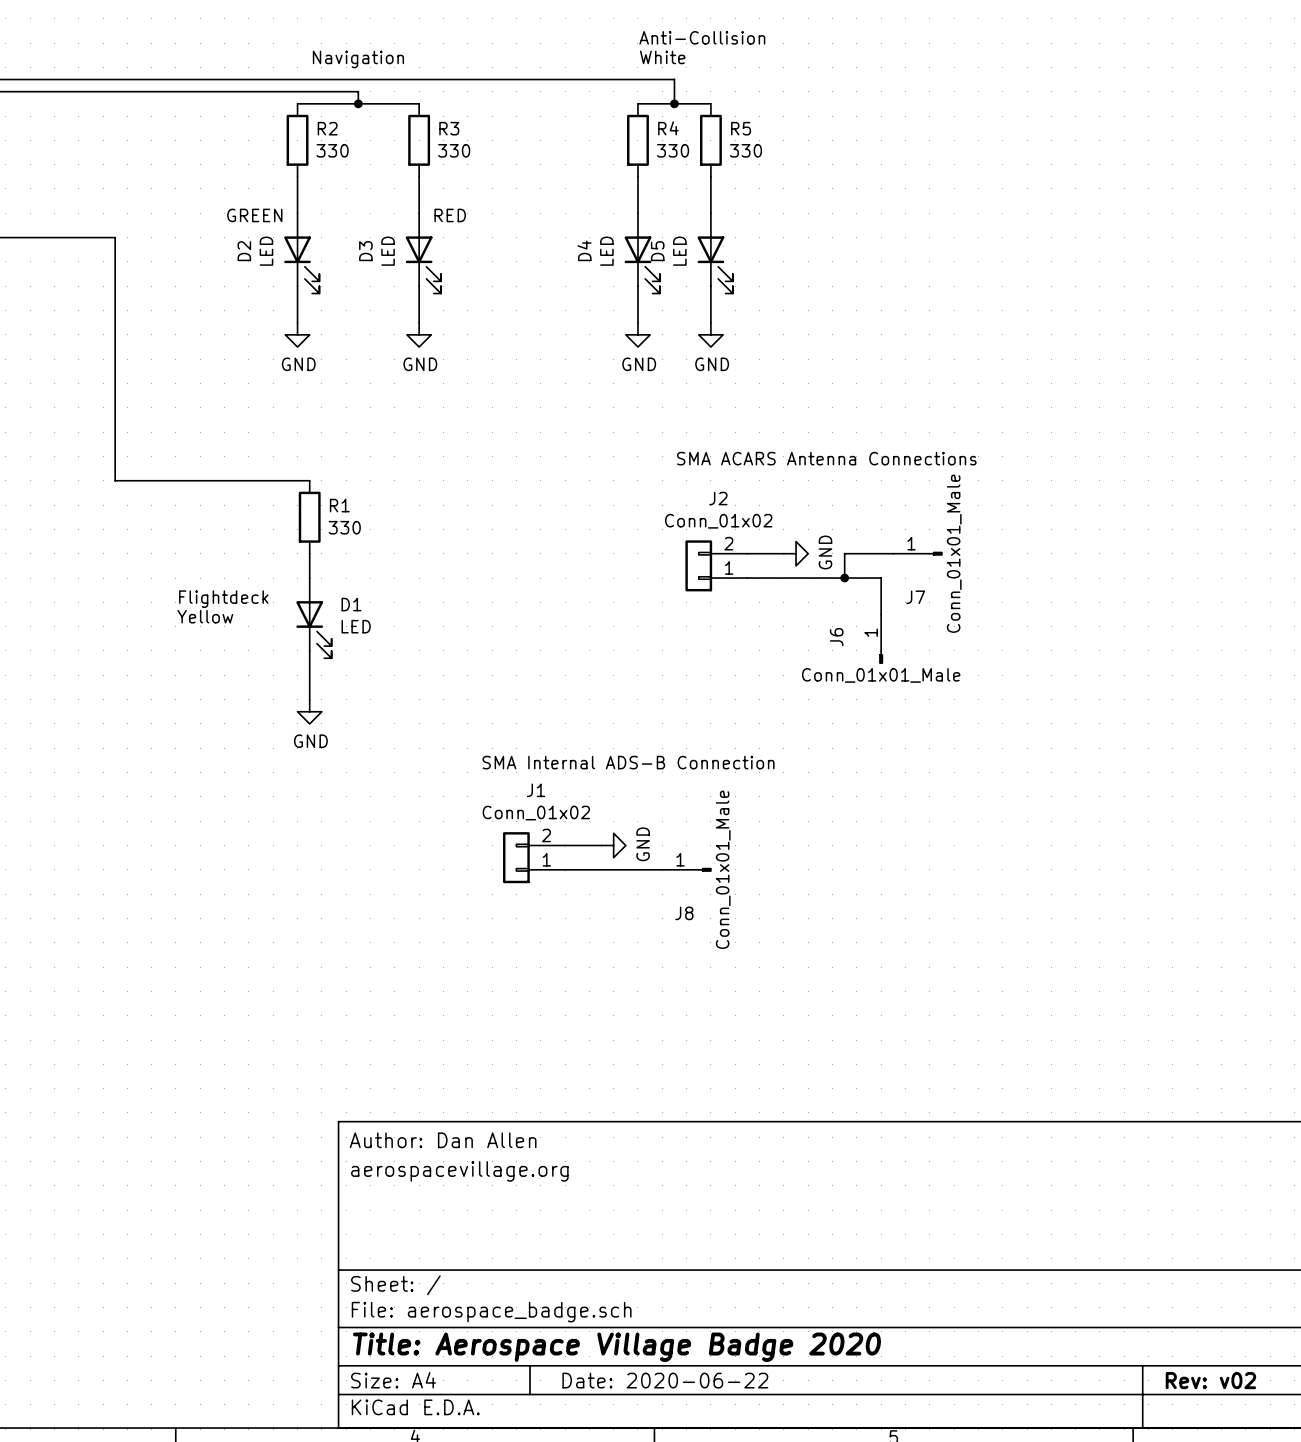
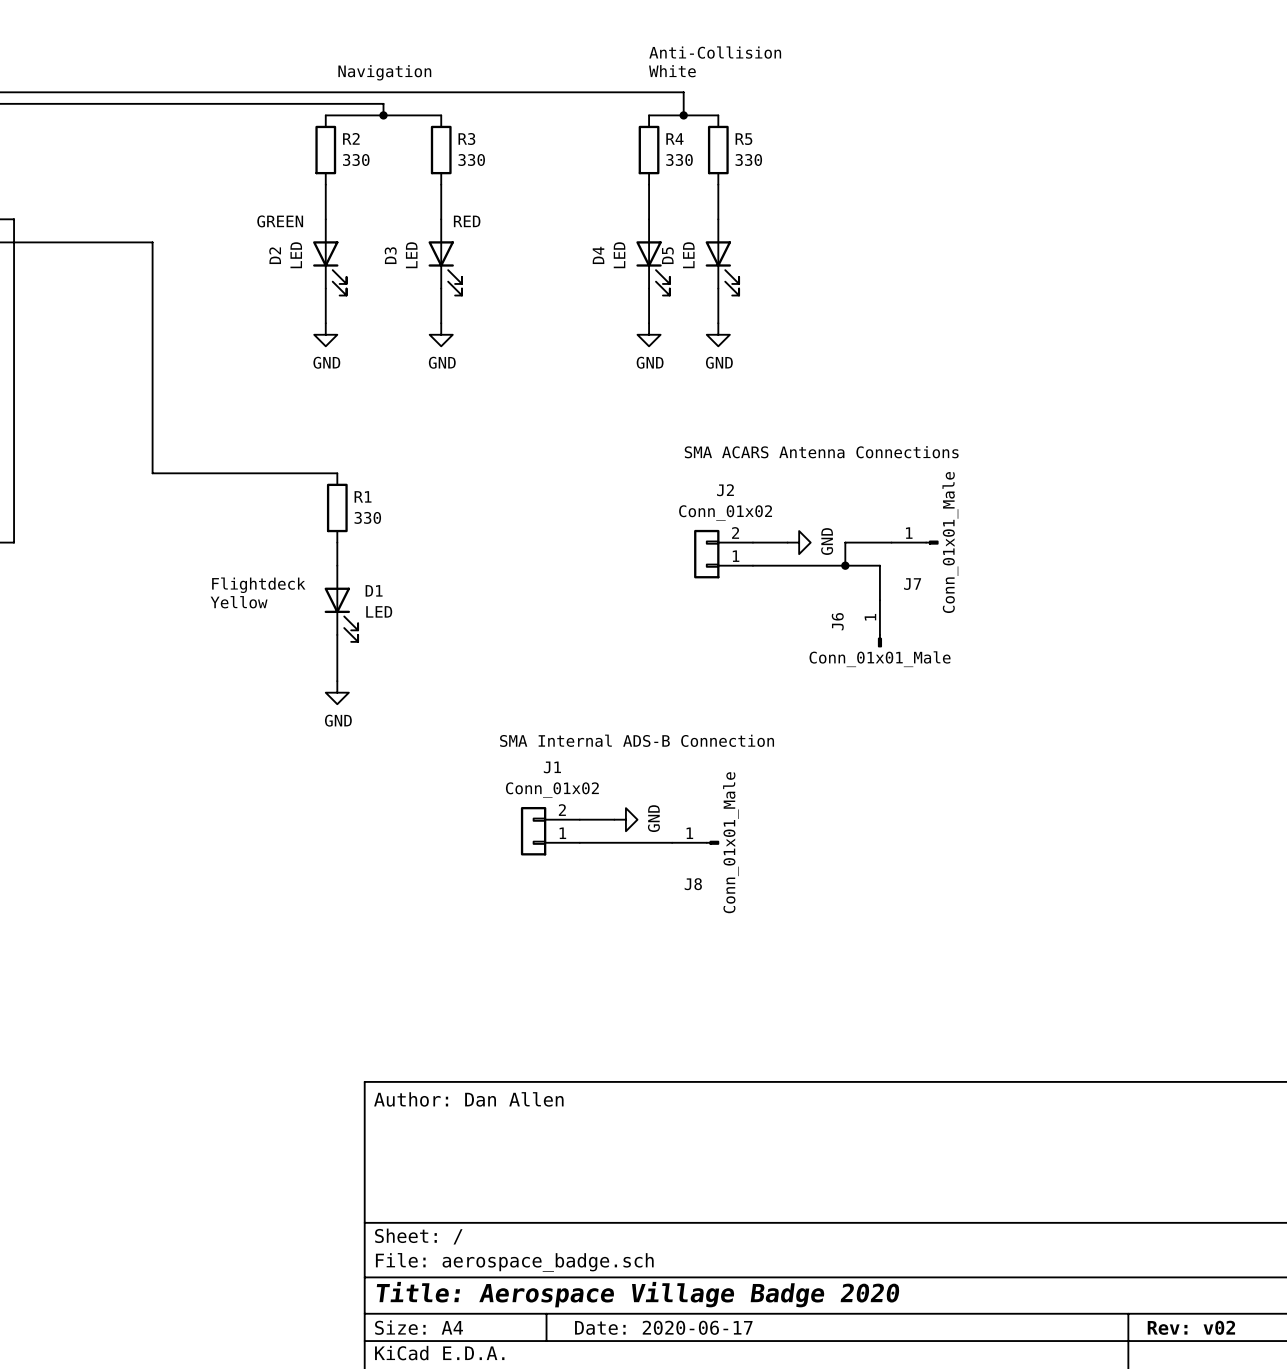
title block: aerospacevillage.org (459, 1171) -> none
title block: Date: 2020-06-22 (665, 1380) -> Date: 2020-06-17 (663, 1327)

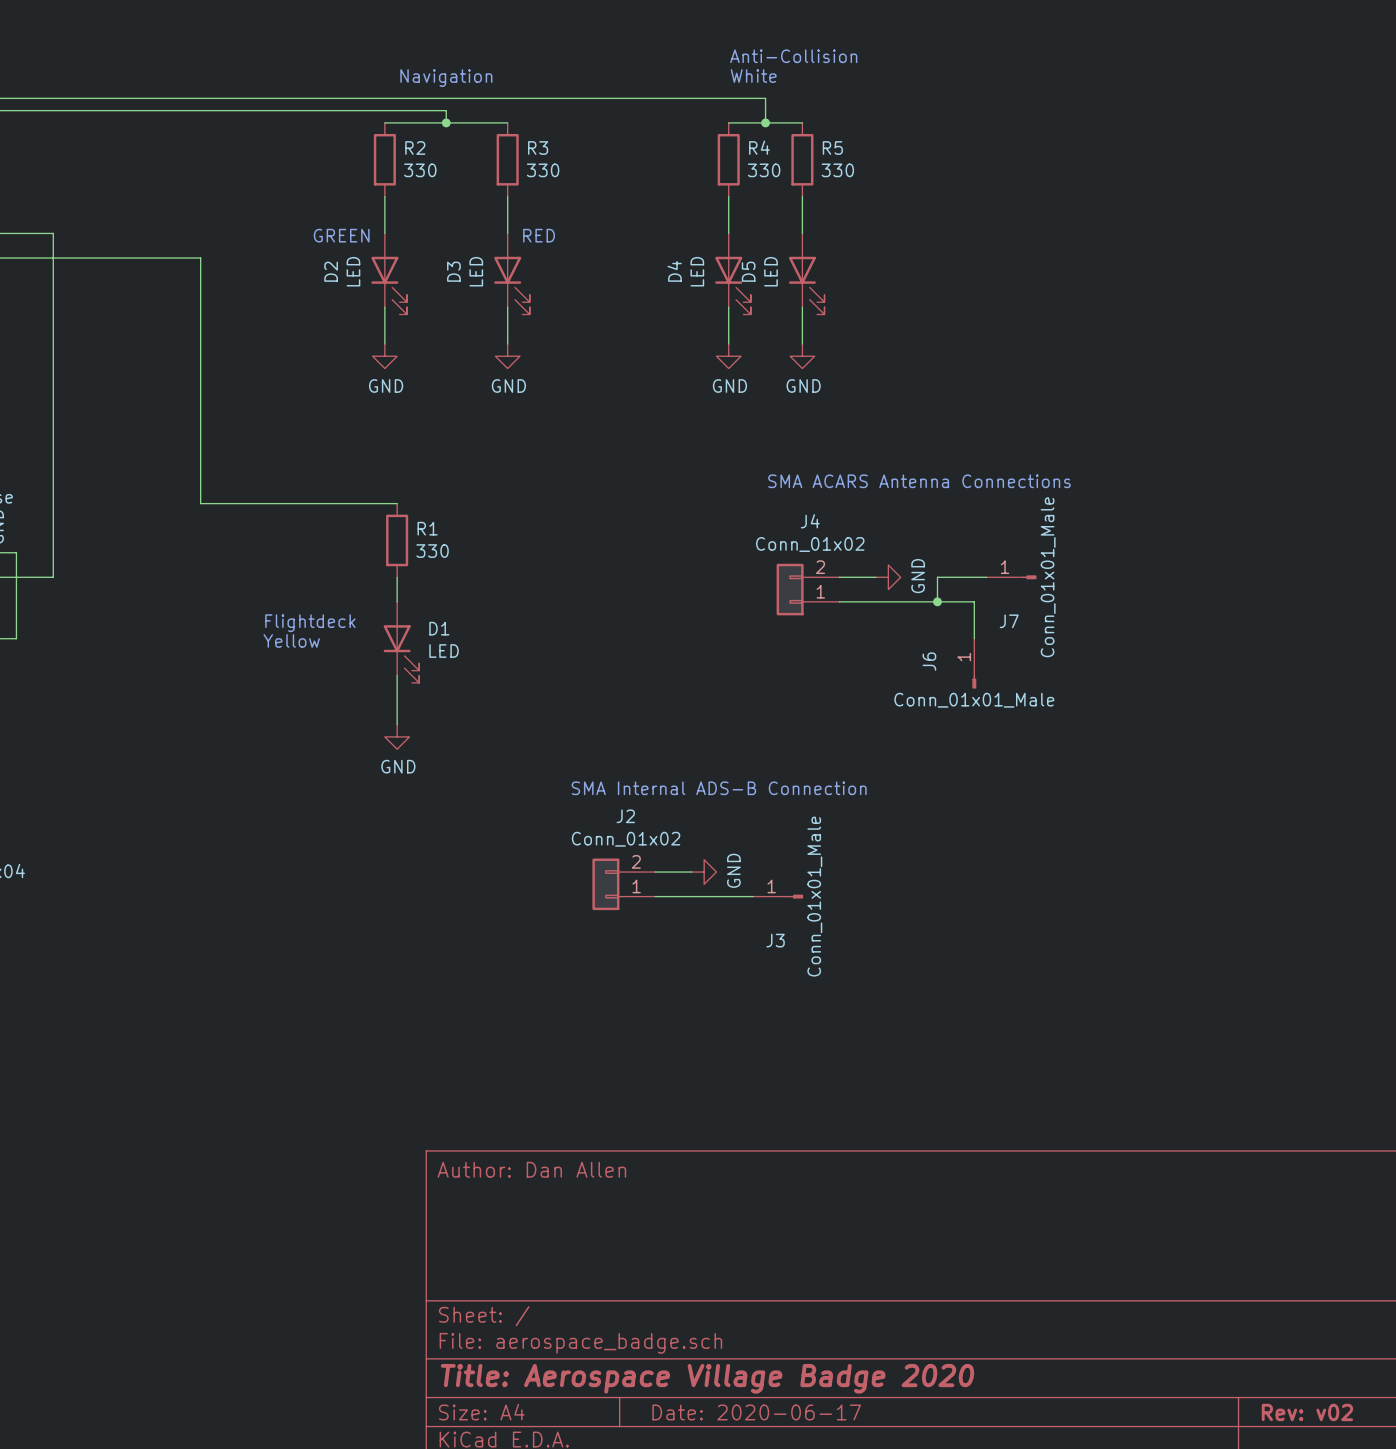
J2 name: J2 (725, 490) -> J4 (810, 521)
J1 name: J1 (552, 767) -> J2 (625, 816)
J8 name: J8 (693, 884) -> J3 (775, 940)

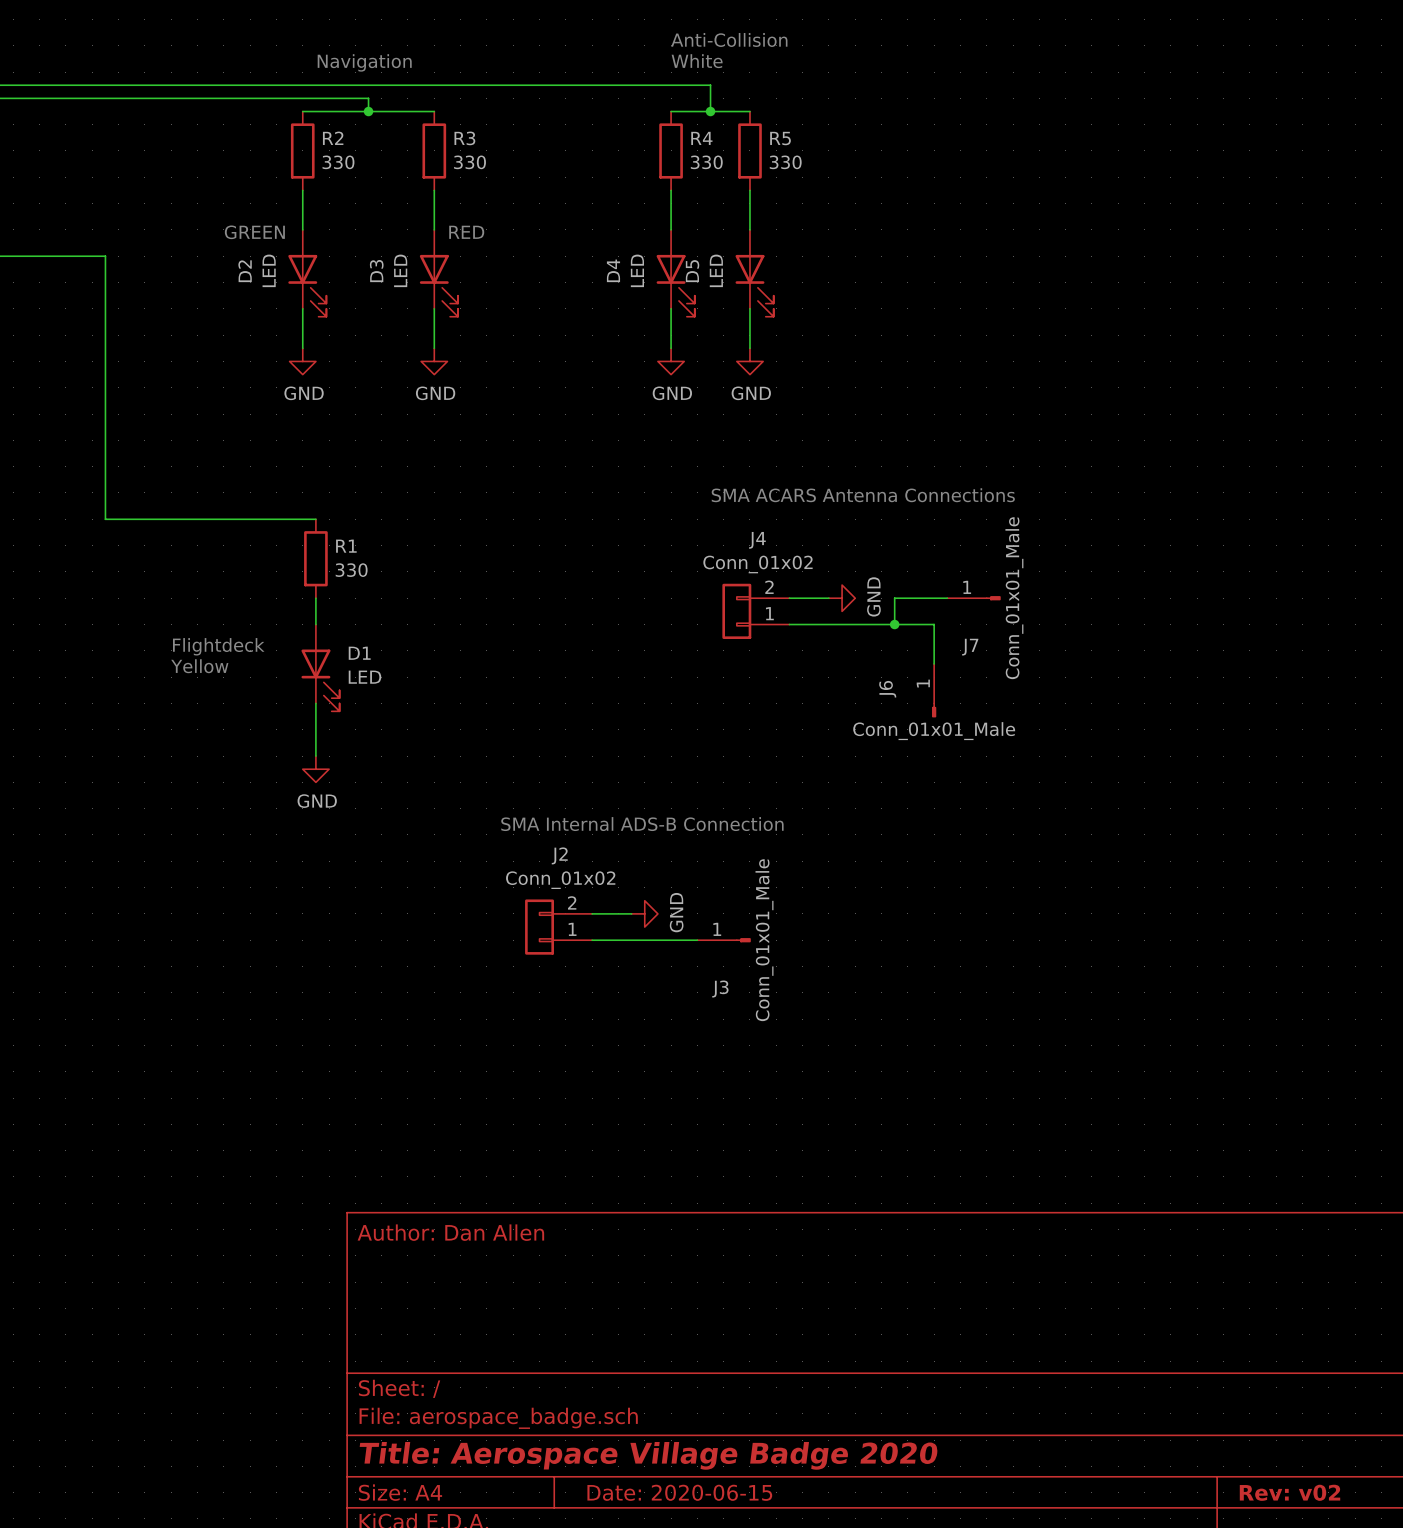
title block: Date: 2020-06-17 (756, 1412) -> Date: 2020-06-15 (679, 1492)

